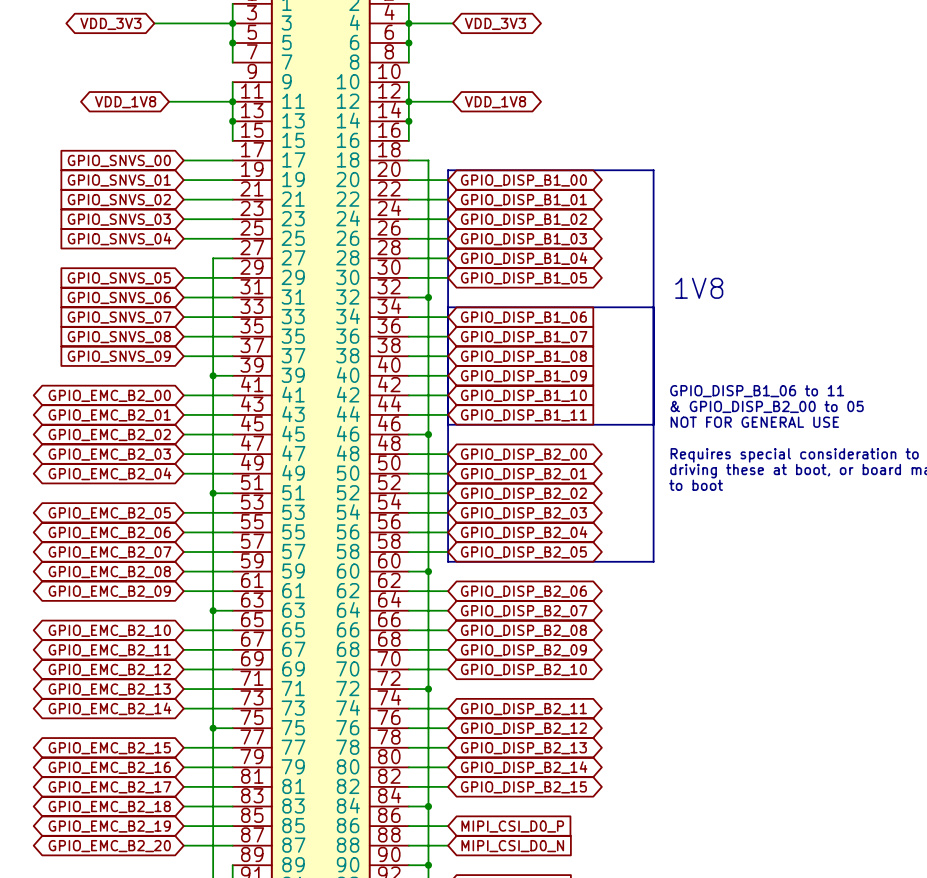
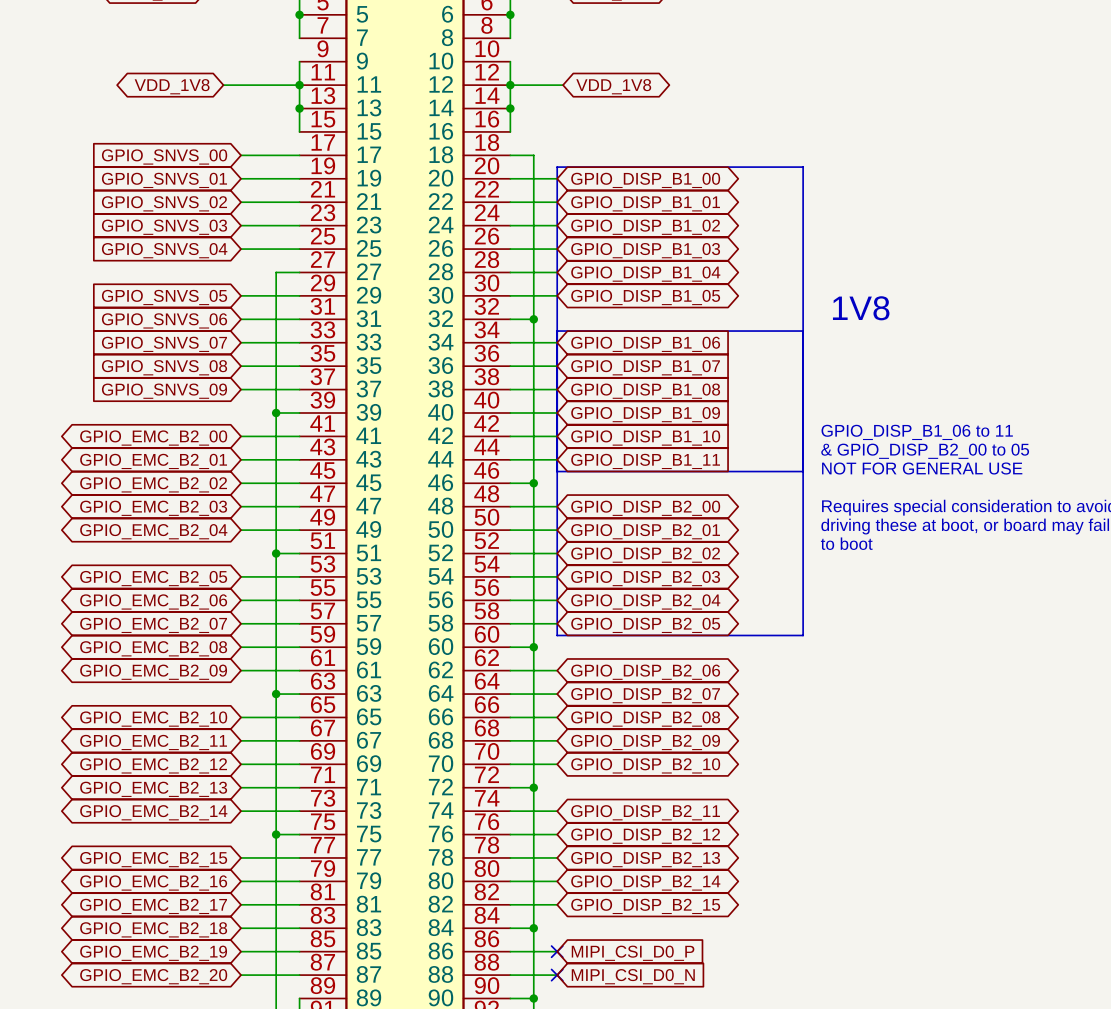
no-connect mark: none -> (557, 951)
no-connect mark: none -> (557, 975)

